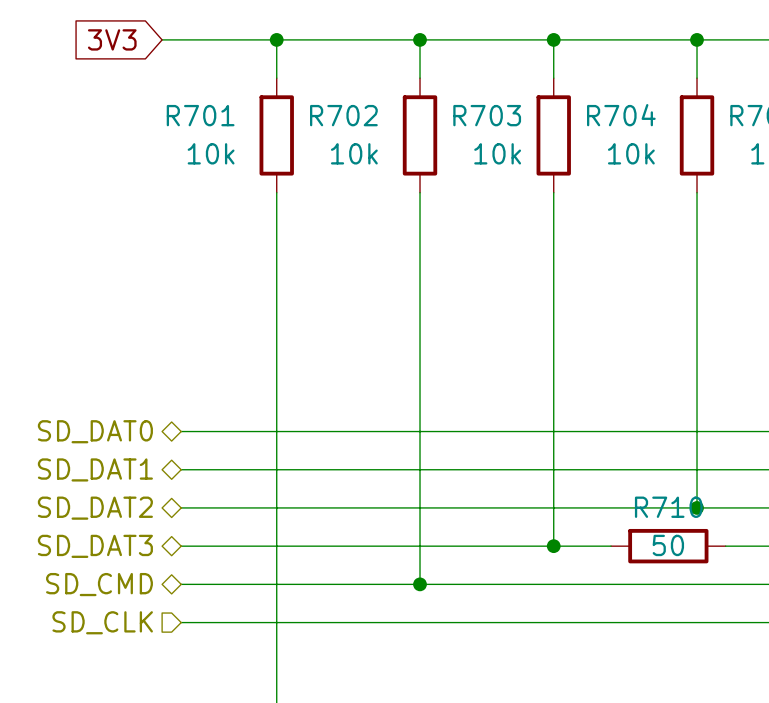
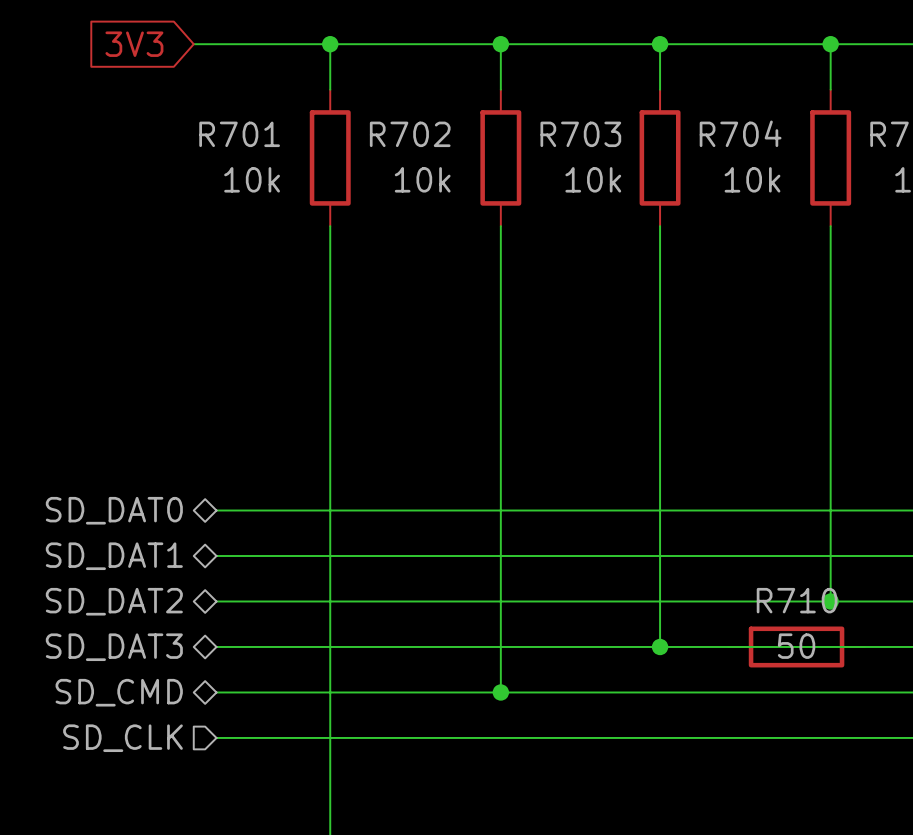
wire: none -> (728, 646) (864, 646)

